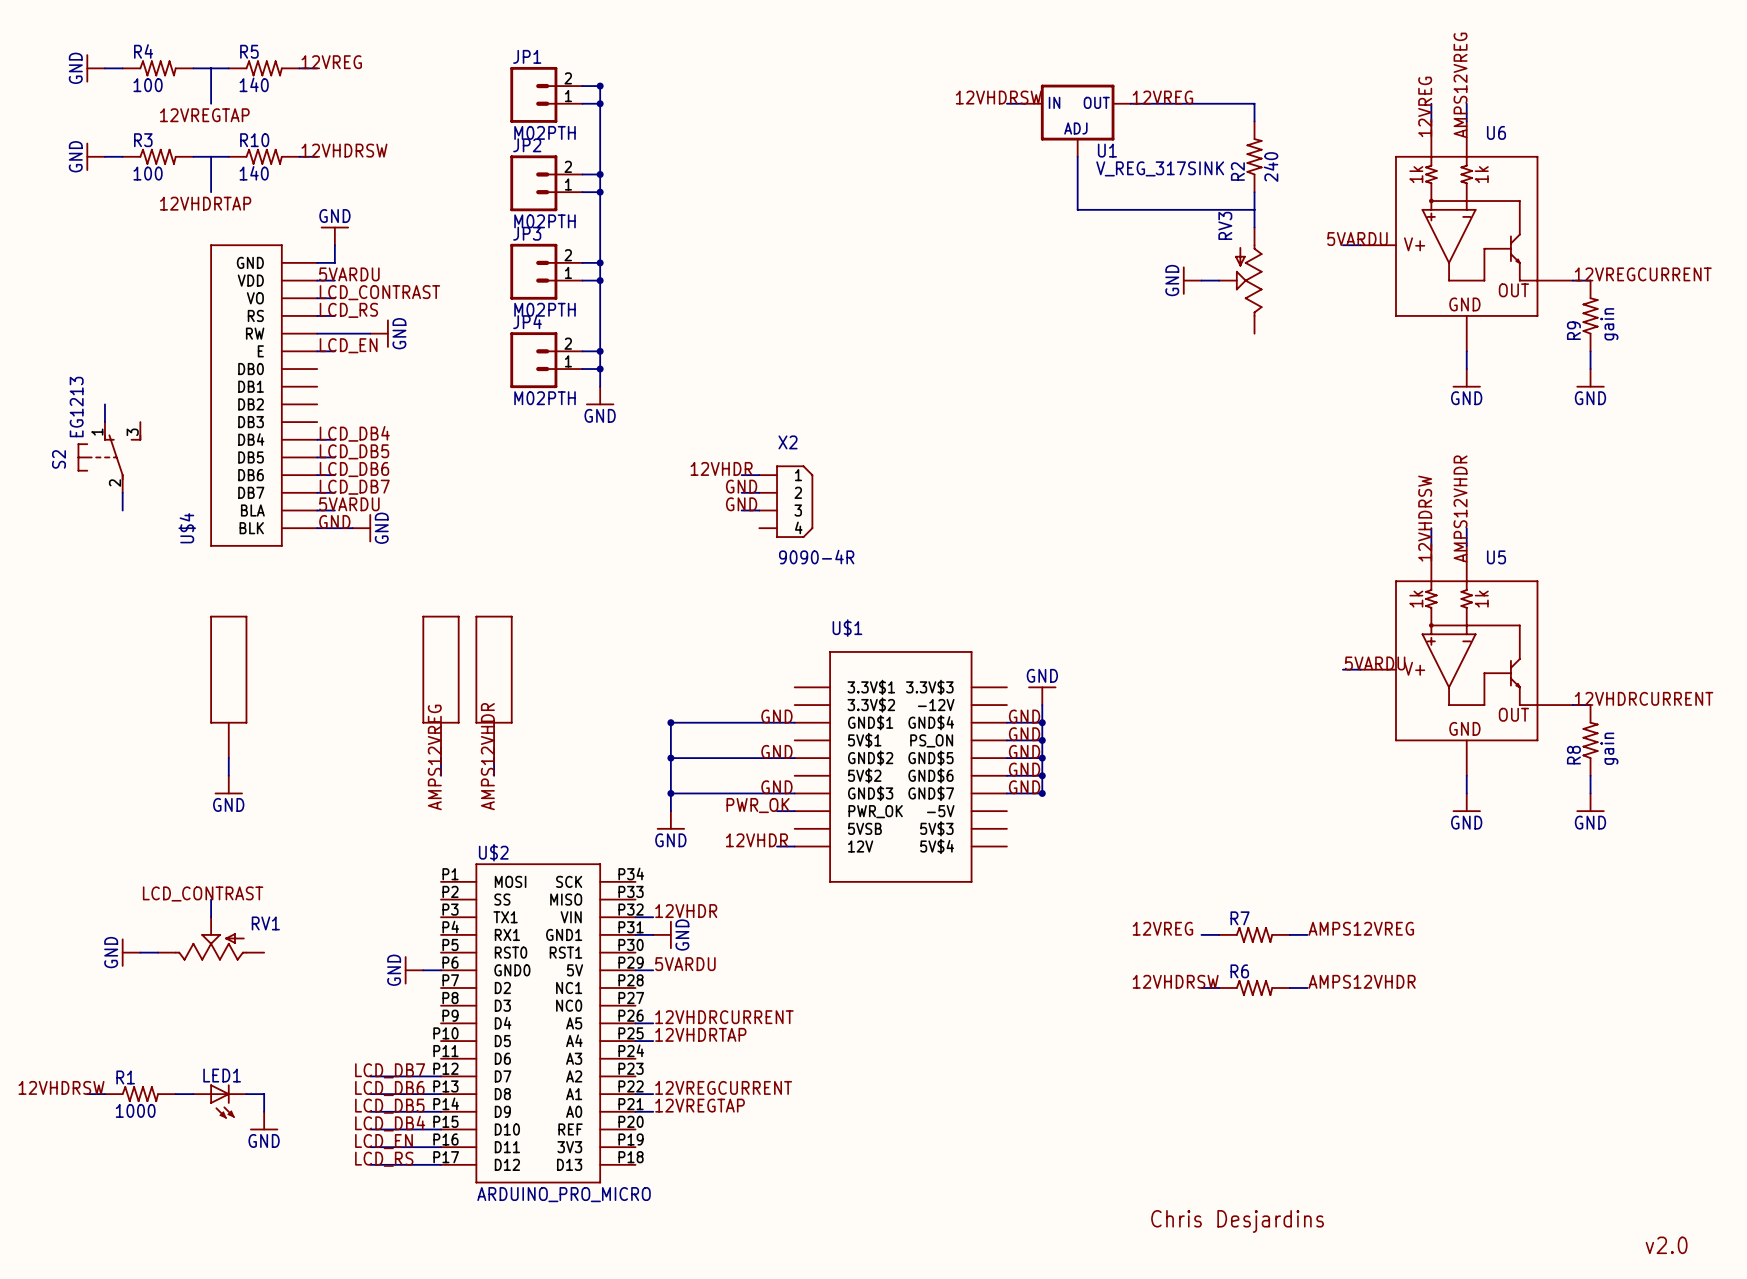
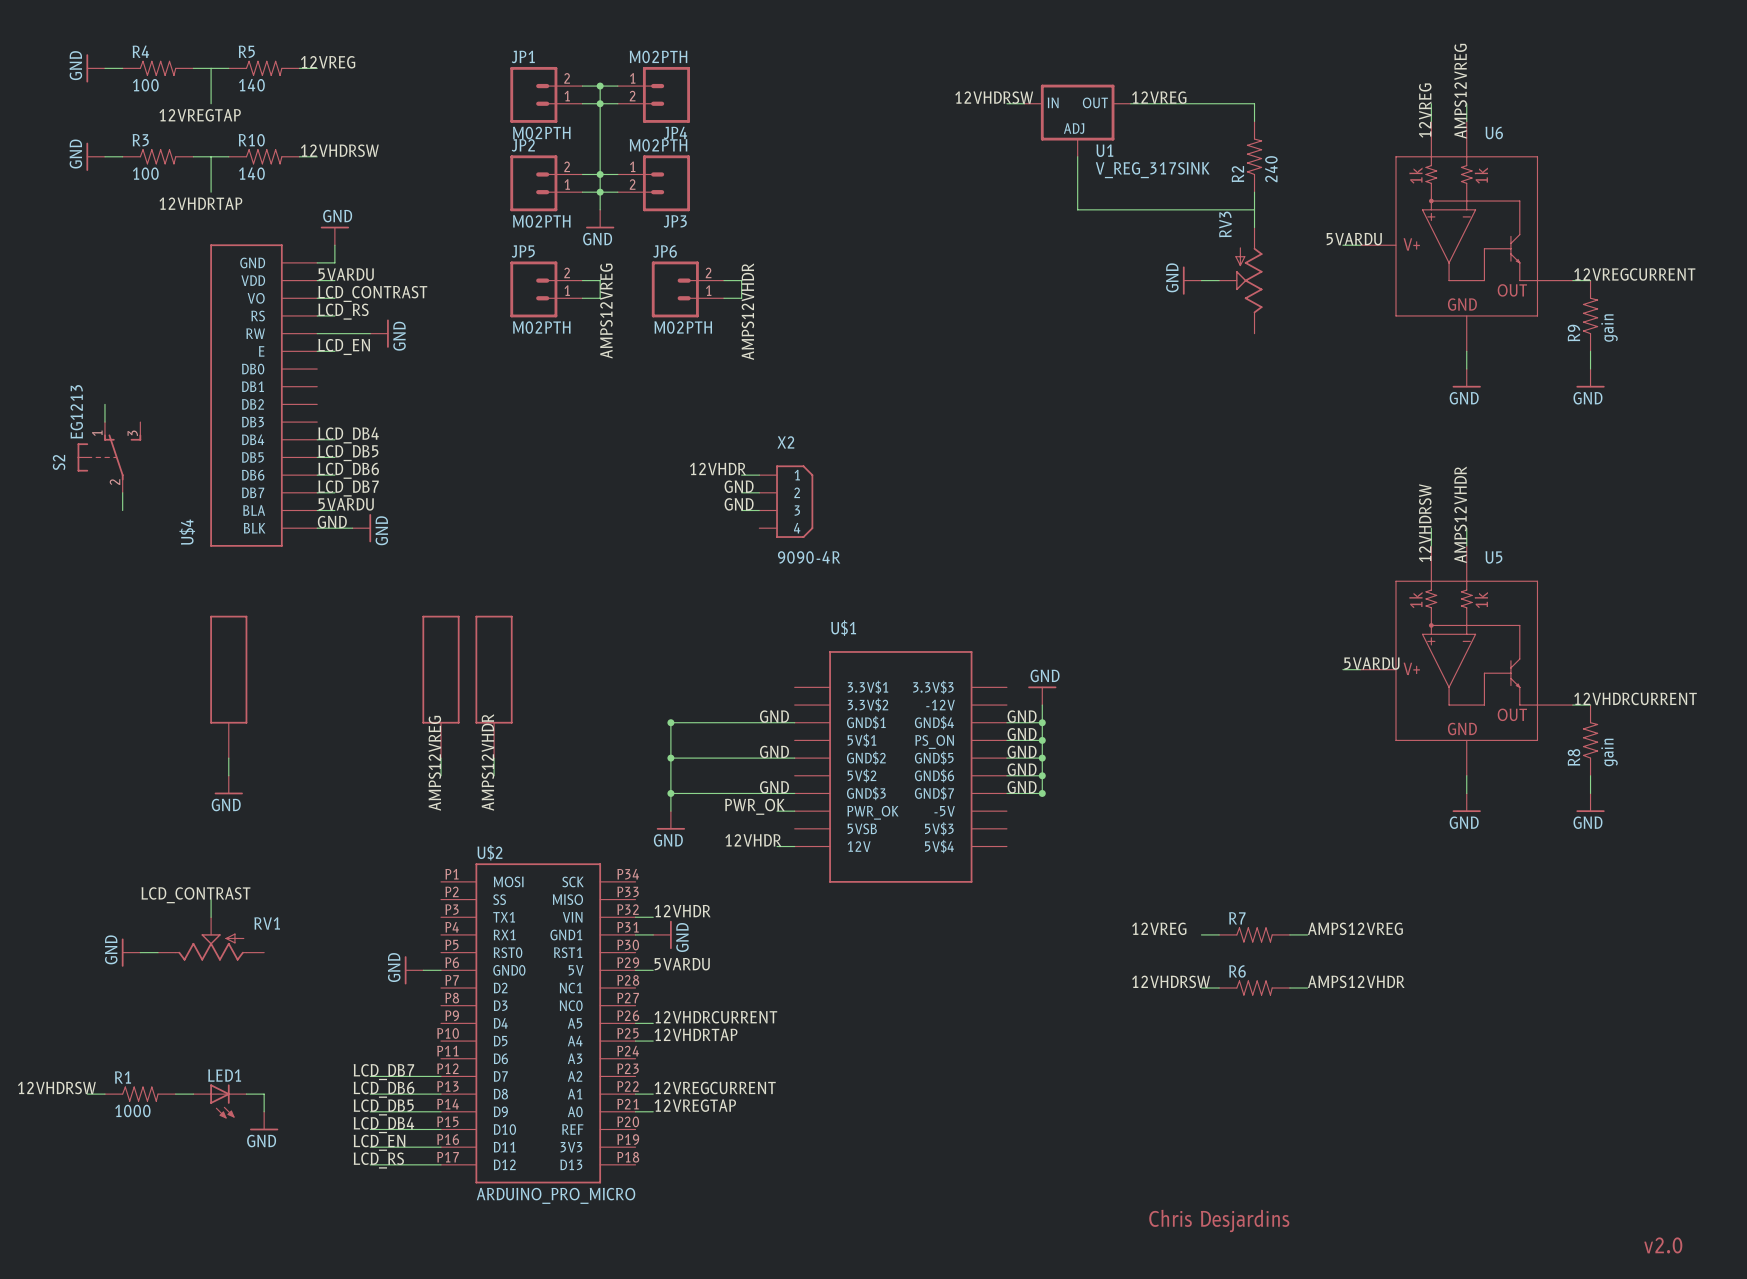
wire: none -> (600, 86) (617, 86)
wire: none -> (600, 174) (617, 174)
wire: (600, 209) (600, 280) -> none
power symbol: none -> GND (600, 219)
wire: (582, 262) (600, 262) -> (600, 103) (617, 103)
junction: (600, 262) -> none
JP3 rotation: 0° (533, 271) -> 180° (666, 183)
JP3 position: (546, 271) -> (653, 183)
junction: (600, 280) -> none
wire: none -> (723, 280) (741, 280) (741, 298) (723, 298)
JP5: none -> M02PTH (546, 289)
JP6: none -> M02PTH (687, 289)
wire: (600, 298) (600, 386) -> (600, 298) (582, 298)
label: none -> AMPS12VREG (606, 311)
label: none -> AMPS12VHDR (747, 311)
wire: (582, 351) (600, 351) -> (600, 192) (617, 192)
junction: (600, 351) -> none
JP4 rotation: 0° (533, 360) -> 180° (666, 94)
JP4 position: (546, 360) -> (653, 94)
wire: (582, 369) (600, 369) -> none
junction: (600, 369) -> none
power symbol: GND (600, 395) -> none

